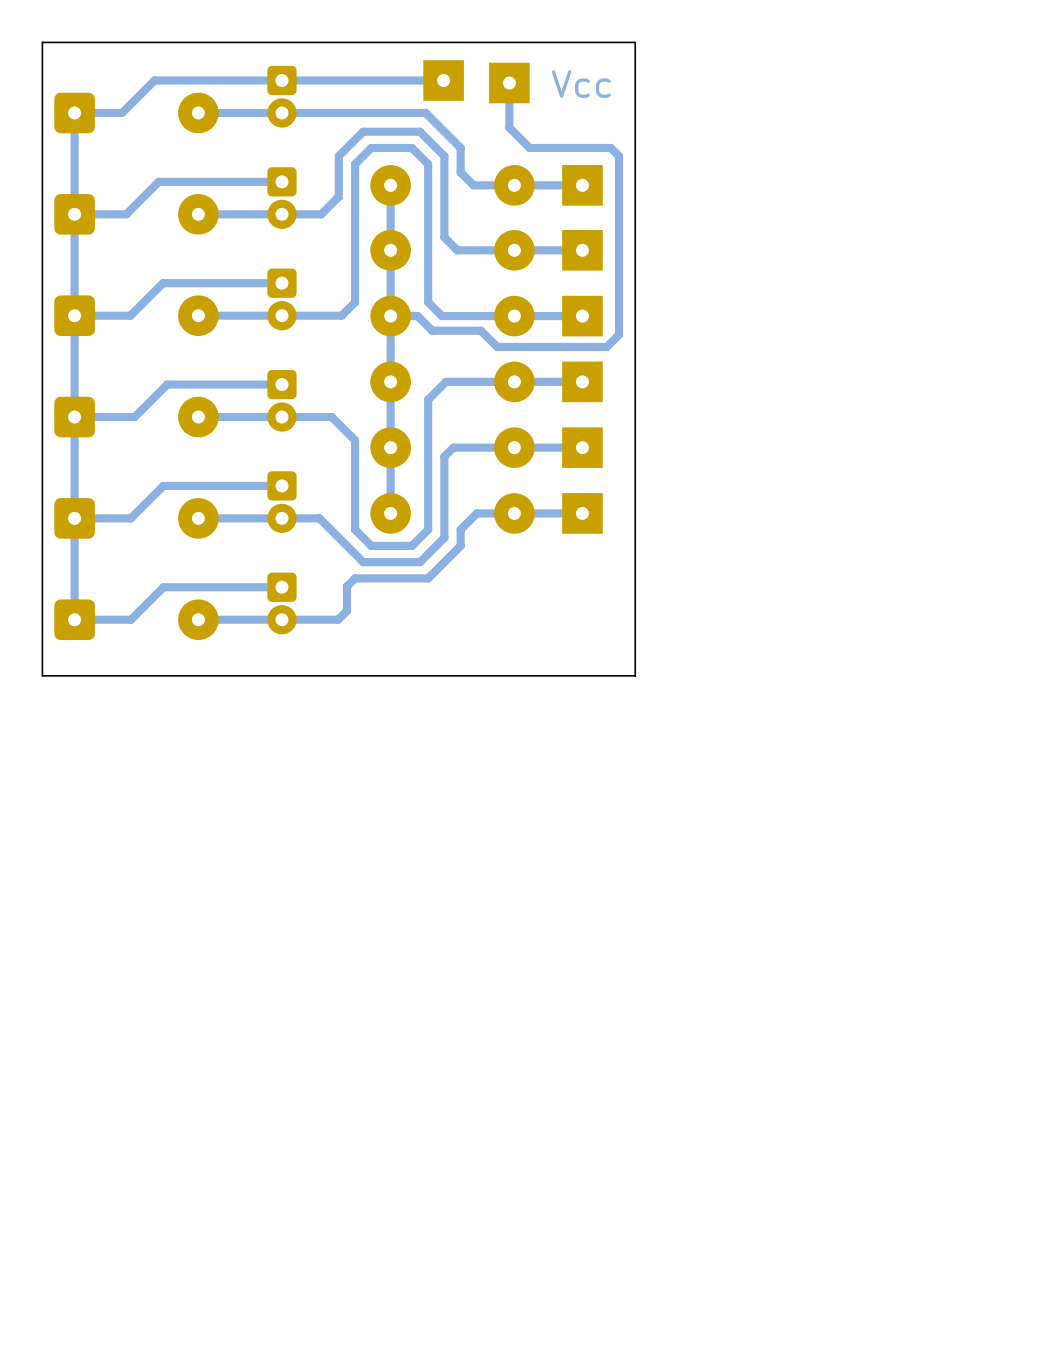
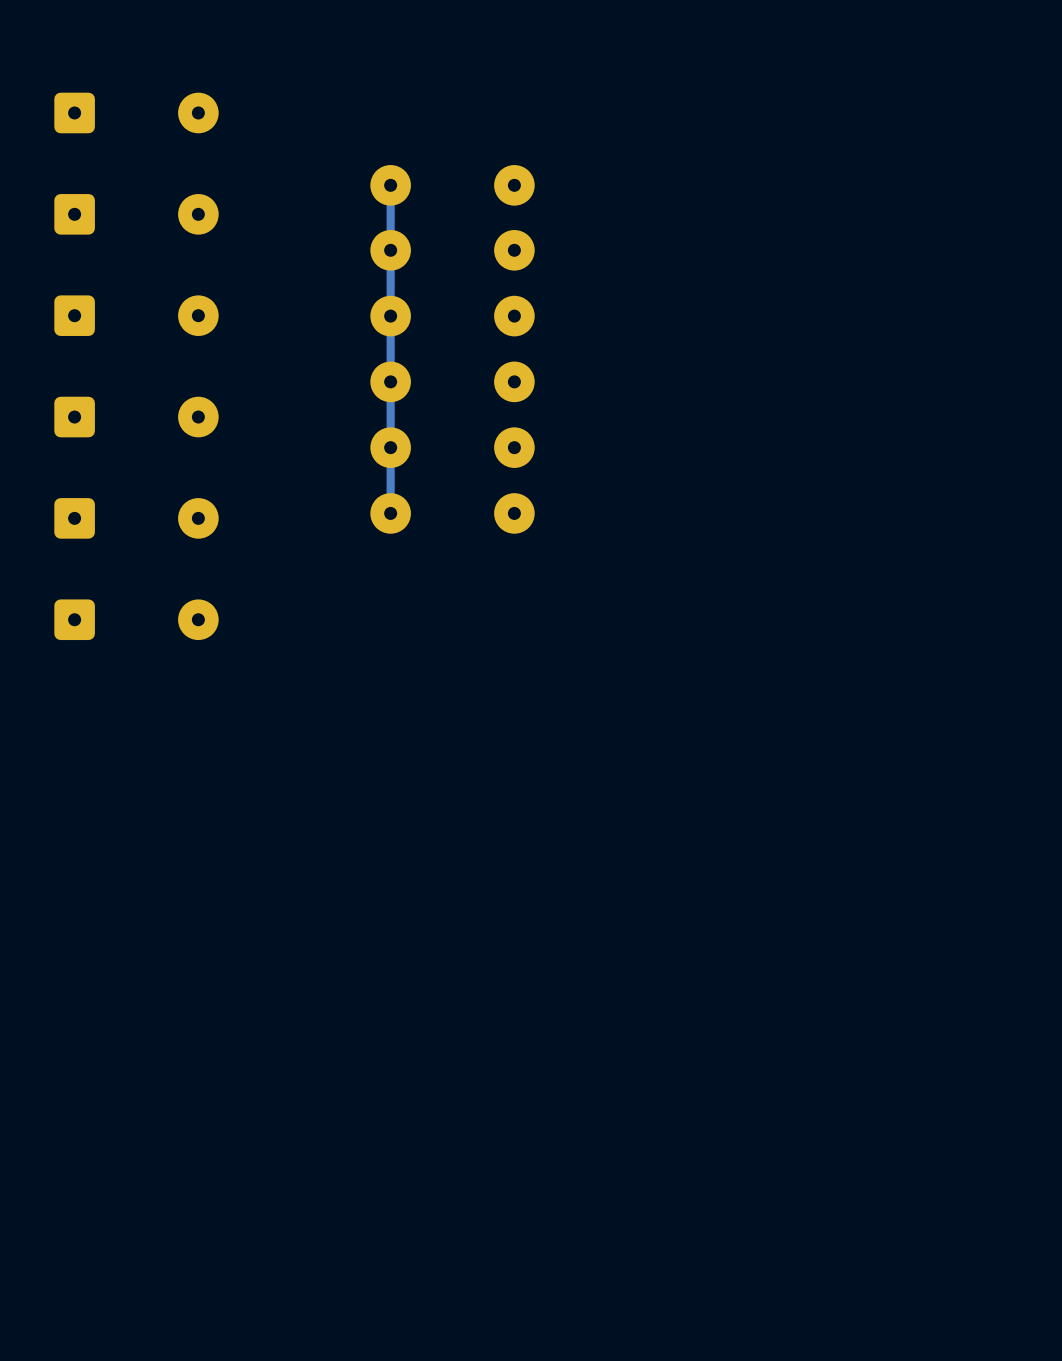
board edge: (635, 42) (42, 42) (42, 675) (635, 675) (635, 42) -> none
bottom track: (443, 80) (154, 80) (122, 112) (74, 112) (74, 619) (131, 619) (163, 587) (281, 587) -> none
part: (443, 80) -> none
bottom track: (509, 83) (509, 127) (529, 147) (610, 147) (619, 156) (619, 334) (606, 346) (497, 346) (480, 330) (432, 330) (417, 316) (390, 316) -> none
part: (509, 83) -> none
text: Vcc (581, 84) -> none
part: (281, 96) -> none
bottom track: (198, 112) (425, 112) (460, 147) (460, 172) (473, 185) (582, 185) -> none
bottom track: (281, 181) (158, 181) (126, 214) (74, 214) -> none
part: (582, 185) -> none
part: (281, 198) -> none
bottom track: (198, 214) (321, 214) (338, 196) (338, 156) (363, 131) (420, 131) (444, 156) (444, 237) (457, 250) (582, 250) -> none
part: (582, 250) -> none
bottom track: (281, 283) (163, 283) (130, 315) (74, 315) -> none
part: (281, 299) -> none
bottom track: (198, 315) (341, 315) (355, 302) (355, 164) (371, 147) (411, 147) (428, 164) (428, 302) (441, 316) (582, 316) -> none
part: (582, 316) -> none
bottom track: (582, 381) (446, 381) (428, 399) (428, 529) (411, 545) (371, 545) (355, 529) (355, 440) (331, 417) (198, 417) -> none
part: (582, 381) -> none
bottom track: (281, 384) (167, 384) (134, 417) (74, 417) -> none
part: (281, 400) -> none
bottom track: (582, 447) (453, 447) (444, 456) (444, 537) (420, 562) (363, 562) (319, 518) (198, 518) -> none
part: (582, 447) -> none
bottom track: (281, 485) (163, 485) (130, 518) (74, 518) -> none
part: (281, 502) -> none
bottom track: (582, 513) (476, 513) (460, 529) (460, 545) (428, 578) (355, 578) (346, 586) (346, 610) (338, 619) (198, 619) -> none
part: (582, 513) -> none
part: (281, 603) -> none

